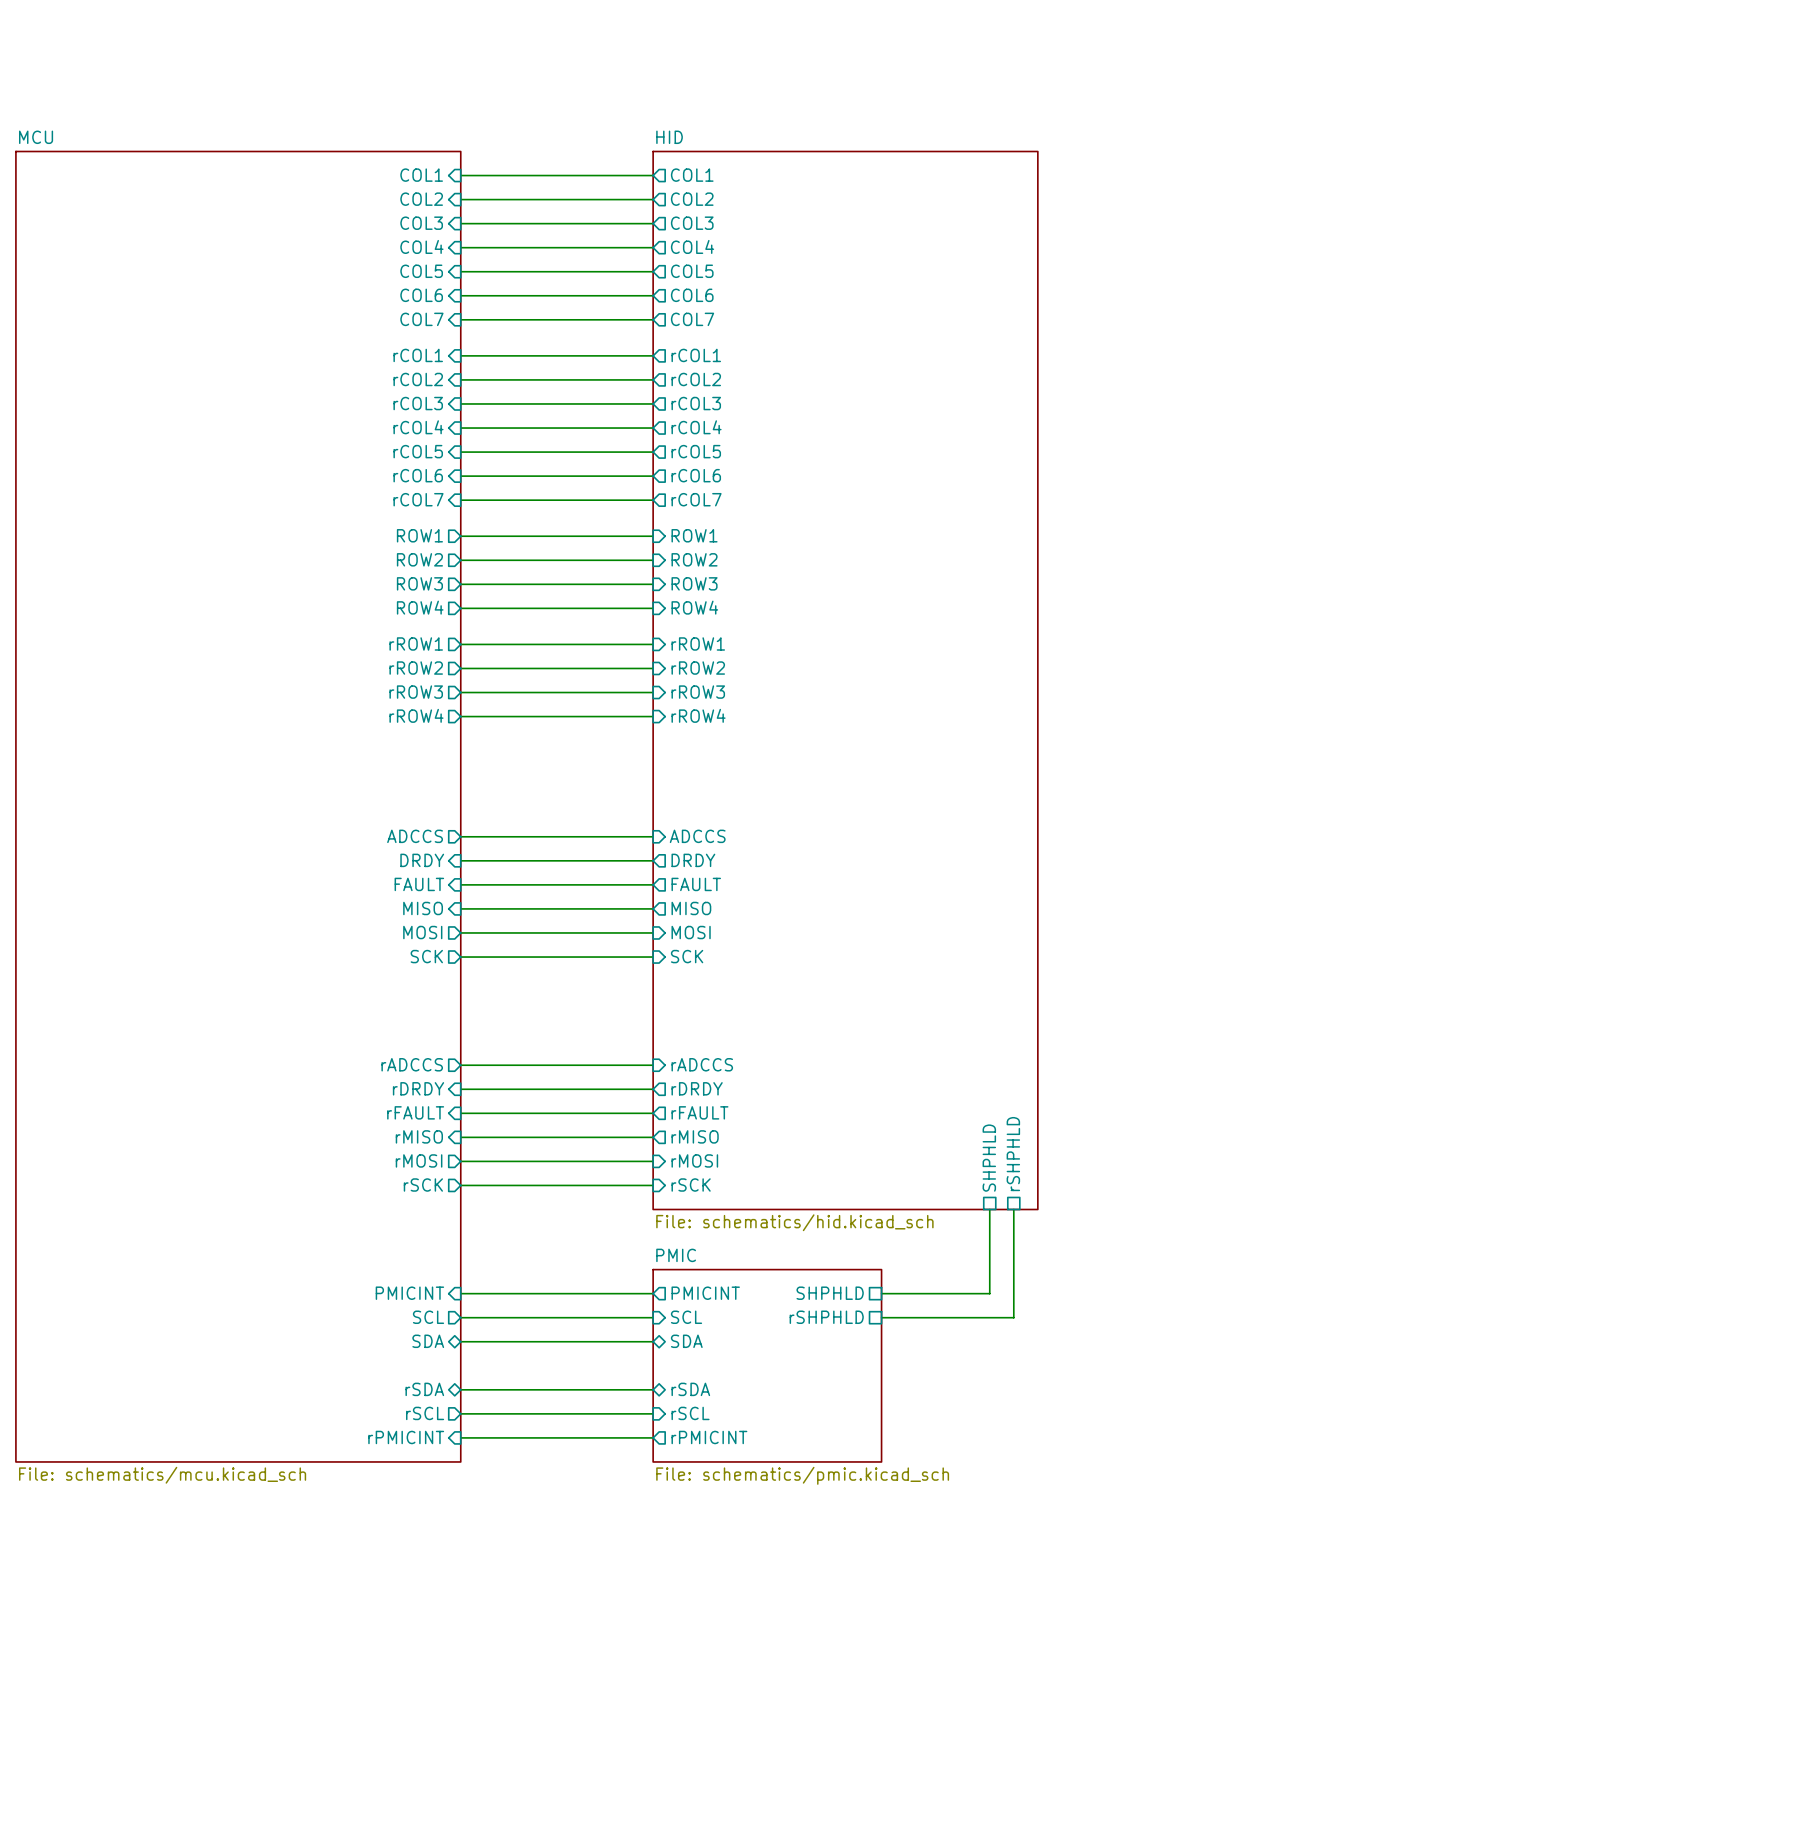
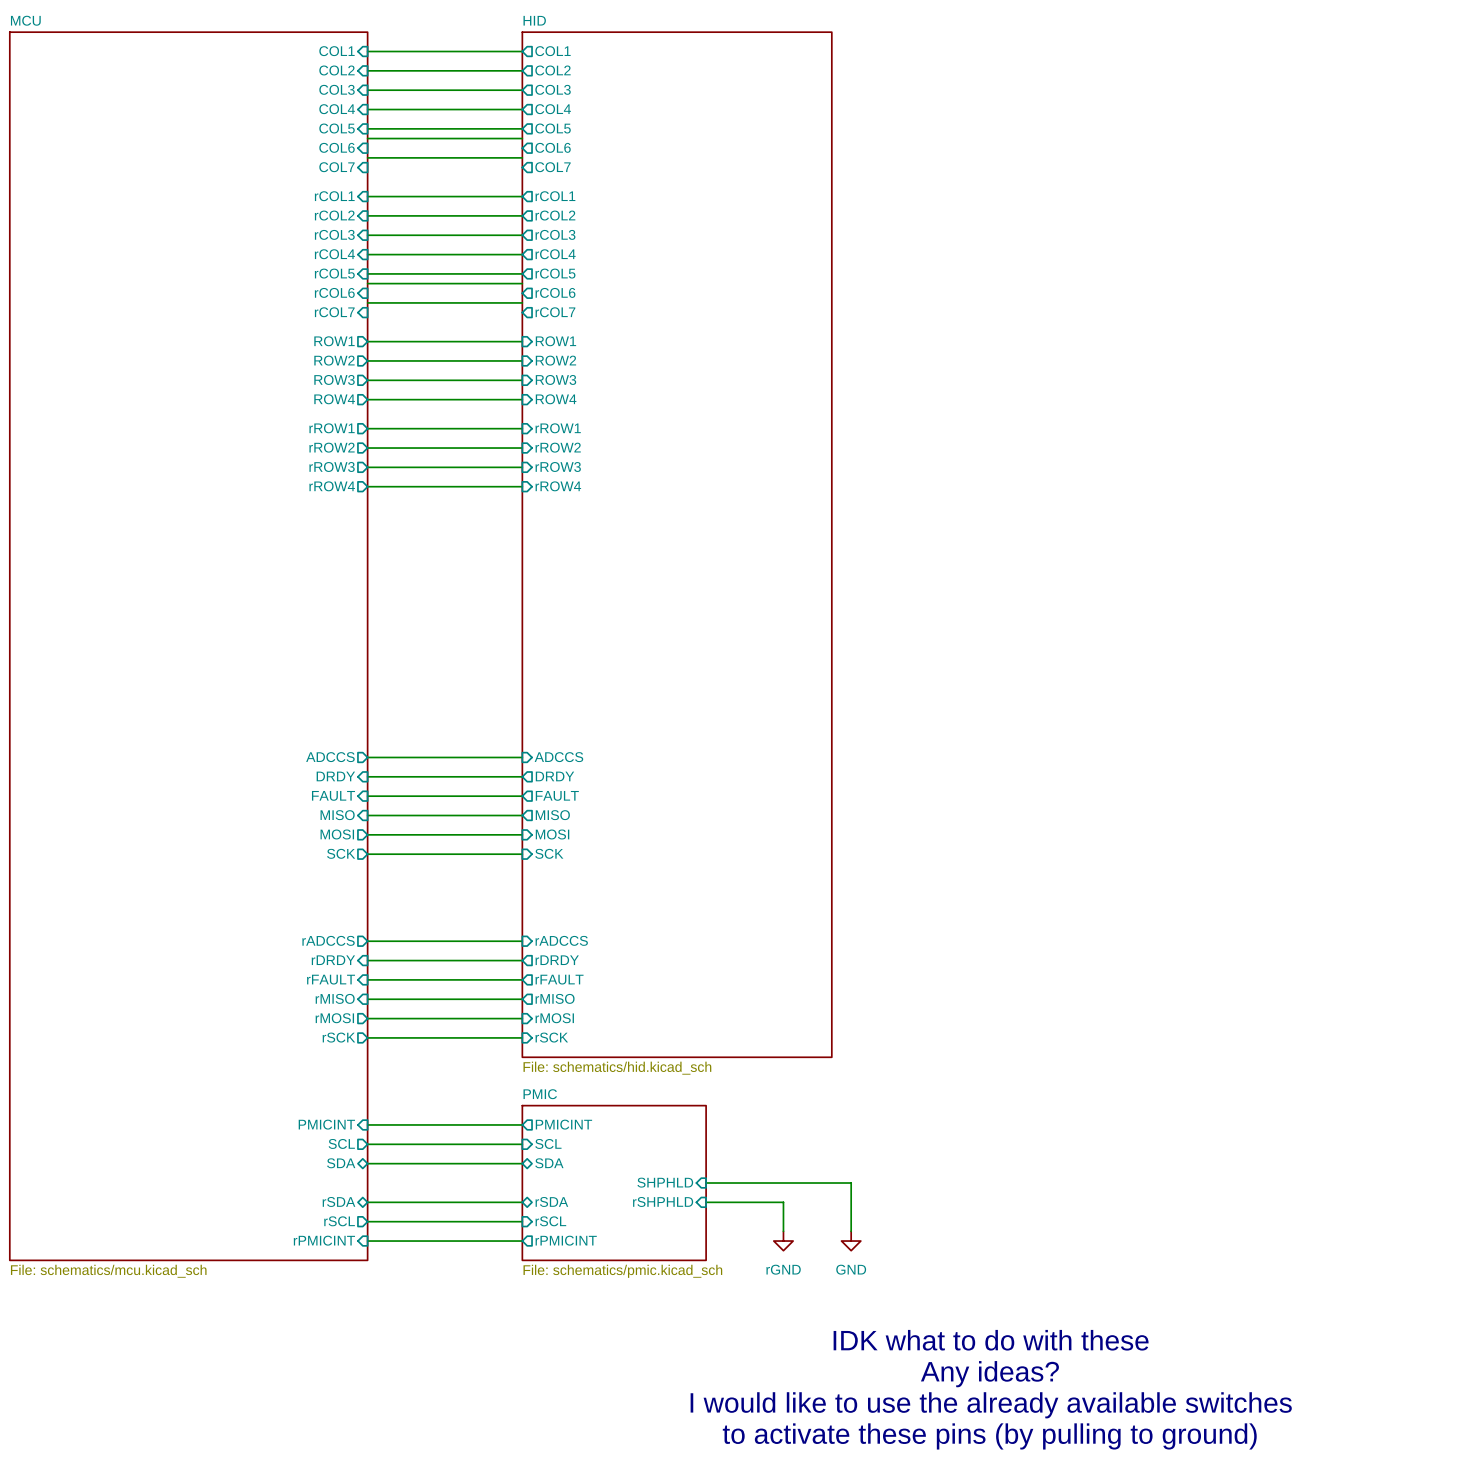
wire: none -> (367, 51) (522, 51)
wire: none -> (367, 70) (522, 70)
wire: none -> (367, 90) (522, 90)
sheet MCU name position: MCU (36, 137) -> MCU (25, 20)
sheet HID name position: HID (669, 137) -> HID (534, 20)
sheet pin: none -> COL4 (337, 109)
sheet pin: none -> COL4 (553, 109)
wire: none -> (367, 109) (522, 109)
sheet MCU shape: [15, 150, 462, 1463] -> [9, 31, 369, 1261]
sheet HID shape: [652, 150, 1039, 1211] -> [521, 31, 833, 1058]
sheet pin: none -> COL5 (337, 128)
sheet pin: none -> COL5 (553, 128)
sheet pin position: COL1 (421, 175) -> COL1 (336, 51)
sheet pin position: COL1 (692, 175) -> COL1 (553, 51)
sheet pin: none -> COL6 (337, 147)
sheet pin: none -> COL6 (553, 147)
sheet pin position: COL2 (421, 199) -> COL2 (336, 70)
sheet pin position: COL2 (692, 199) -> COL2 (553, 70)
sheet pin: none -> COL7 (336, 167)
sheet pin: none -> COL7 (553, 167)
sheet pin position: COL3 (421, 223) -> COL3 (337, 89)
wire: (460, 223) (653, 223) -> (367, 128) (522, 128)
sheet pin position: COL3 (692, 223) -> COL3 (553, 89)
sheet pin: COL4 (421, 246) -> rCOL1 (334, 196)
sheet pin: COL4 (692, 246) -> rCOL1 (555, 196)
sheet pin: COL5 (421, 271) -> rCOL2 (334, 215)
sheet pin: COL5 (692, 271) -> rCOL2 (555, 215)
sheet pin: COL6 (421, 295) -> rCOL3 (334, 234)
sheet pin: COL6 (692, 295) -> rCOL3 (555, 234)
sheet pin: COL7 (421, 319) -> rCOL4 (334, 254)
sheet pin: COL7 (692, 319) -> rCOL4 (555, 254)
sheet pin: none -> rCOL5 (334, 273)
sheet pin: none -> rCOL5 (555, 273)
sheet pin: rCOL1 (418, 355) -> none
sheet pin: rCOL1 (696, 355) -> none
sheet pin: none -> rCOL6 (334, 292)
sheet pin: none -> rCOL6 (555, 292)
sheet pin: rCOL2 (418, 379) -> none
sheet pin: rCOL2 (696, 379) -> none
sheet pin: none -> rCOL7 (334, 312)
sheet pin: none -> rCOL7 (555, 312)
sheet pin: rCOL3 (418, 403) -> none
wire: (460, 403) (653, 403) -> (367, 273) (522, 273)
sheet pin: rCOL3 (696, 403) -> none
sheet pin shape: input (418, 427) -> output (334, 341)
sheet pin: rCOL4 (418, 427) -> ROW1 (334, 341)
sheet pin shape: output (696, 427) -> input (555, 341)
sheet pin: rCOL4 (696, 427) -> ROW1 (555, 341)
sheet pin shape: input (418, 451) -> output (334, 360)
sheet pin: rCOL5 (418, 451) -> ROW2 (334, 360)
sheet pin shape: output (696, 451) -> input (555, 360)
sheet pin: rCOL5 (696, 451) -> ROW2 (555, 360)
sheet pin shape: input (418, 475) -> output (334, 379)
sheet pin: rCOL6 (418, 475) -> ROW3 (334, 379)
sheet pin shape: output (696, 475) -> input (555, 379)
sheet pin: rCOL6 (696, 475) -> ROW3 (555, 379)
sheet pin shape: input (418, 499) -> output (334, 399)
sheet pin: rCOL7 (418, 499) -> ROW4 (334, 399)
sheet pin shape: output (696, 499) -> input (556, 399)
sheet pin: rCOL7 (696, 499) -> ROW4 (556, 399)
sheet pin: ROW1 (419, 535) -> rROW1 (332, 428)
sheet pin: ROW1 (694, 535) -> rROW1 (558, 428)
sheet pin: ROW2 (419, 559) -> rROW2 (332, 447)
sheet pin: ROW2 (694, 559) -> rROW2 (558, 447)
sheet pin: ROW3 (419, 583) -> rROW3 (332, 466)
sheet pin: ROW3 (694, 583) -> rROW3 (558, 466)
sheet pin: ROW4 (420, 607) -> rROW4 (332, 486)
sheet pin: ROW4 (694, 607) -> rROW4 (558, 486)
sheet pin: rROW1 (416, 643) -> none
sheet pin: rROW1 (698, 643) -> none
wire: (460, 644) (653, 644) -> none
sheet pin: rROW2 (416, 668) -> none
wire: (460, 668) (653, 668) -> none
sheet pin: rROW2 (698, 668) -> none
sheet pin: rROW3 (416, 692) -> none
wire: (460, 692) (653, 692) -> none
sheet pin: rROW3 (698, 692) -> none
sheet pin: rROW4 (416, 715) -> none
sheet pin: rROW4 (698, 715) -> none
wire: (460, 716) (653, 716) -> none
sheet pin position: ADCCS (415, 836) -> ADCCS (330, 757)
wire: (460, 836) (653, 836) -> none
sheet pin position: ADCCS (697, 836) -> ADCCS (558, 757)
sheet pin position: DRDY (422, 860) -> DRDY (335, 776)
wire: (460, 860) (653, 860) -> (367, 757) (522, 757)
sheet pin position: DRDY (693, 860) -> DRDY (554, 776)
sheet pin position: FAULT (419, 884) -> FAULT (333, 795)
wire: (460, 884) (653, 884) -> (367, 776) (522, 776)
sheet pin position: FAULT (696, 884) -> FAULT (557, 795)
sheet pin position: MISO (423, 908) -> MISO (337, 815)
wire: (460, 908) (653, 908) -> (367, 796) (522, 796)
sheet pin position: MISO (691, 908) -> MISO (552, 815)
sheet pin position: MOSI (422, 932) -> MOSI (337, 834)
wire: (460, 932) (653, 932) -> (367, 815) (522, 815)
sheet pin position: MOSI (691, 932) -> MOSI (552, 834)
sheet pin: SCK (426, 956) -> none
sheet pin: SCK (687, 956) -> none
wire: (460, 957) (653, 957) -> (367, 834) (522, 834)
sheet pin: rADCCS (412, 1064) -> SCK (341, 853)
sheet pin: rADCCS (702, 1064) -> SCK (549, 853)
sheet pin position: rDRDY (418, 1088) -> rDRDY (333, 960)
sheet pin position: rDRDY (697, 1088) -> rDRDY (557, 960)
wire: (460, 1089) (653, 1089) -> (367, 941) (522, 941)
sheet pin position: rFAULT (415, 1112) -> rFAULT (331, 979)
sheet pin position: rFAULT (699, 1112) -> rFAULT (559, 979)
wire: (460, 1113) (653, 1113) -> (367, 960) (522, 960)
sheet pin position: rMISO (419, 1136) -> rMISO (335, 998)
sheet pin position: rMISO (695, 1136) -> rMISO (555, 998)
wire: (460, 1137) (653, 1137) -> (367, 979) (522, 979)
sheet pin: rSHPHLD (1013, 1154) -> none
sheet pin: SHPHLD (989, 1158) -> none
sheet pin position: rMOSI (419, 1160) -> rMOSI (334, 1018)
sheet pin position: rMOSI (694, 1160) -> rMOSI (554, 1018)
wire: (460, 1161) (653, 1161) -> (367, 999) (522, 999)
sheet pin: none -> rADCCS (328, 940)
sheet pin: none -> rADCCS (561, 940)
sheet pin: rSCK (423, 1185) -> none
wire: (460, 1185) (653, 1185) -> (367, 1018) (522, 1018)
sheet pin: rSCK (691, 1185) -> none
wire: (989, 1209) (989, 1293) (881, 1293) -> none
wire: (1013, 1209) (1013, 1317) (881, 1317) -> none
sheet HID value position: File: schematics/hid.kicad_sch (794, 1222) -> File: schematics/hid.kicad_sch (617, 1068)
sheet pin shape: input (409, 1293) -> output (338, 1037)
sheet pin: PMICINT (409, 1293) -> rSCK (338, 1037)
sheet pin shape: output (705, 1293) -> input (551, 1037)
sheet pin: PMICINT (705, 1293) -> rSCK (551, 1037)
sheet pin: SHPHLD (830, 1293) -> none
sheet pin position: SCL (428, 1317) -> SCL (341, 1143)
wire: (460, 1317) (653, 1317) -> (367, 1124) (522, 1124)
sheet pin position: SCL (686, 1317) -> SCL (548, 1143)
sheet pin: rSHPHLD (826, 1317) -> none
sheet pin position: SDA (428, 1341) -> SDA (341, 1163)
wire: (460, 1341) (653, 1341) -> (367, 1144) (522, 1144)
sheet pin position: SDA (686, 1341) -> SDA (549, 1163)
sheet PMIC position: (767, 1365) -> (614, 1183)
sheet pin position: rSDA (424, 1389) -> rSDA (339, 1201)
wire: (460, 1389) (653, 1389) -> (367, 1163) (522, 1163)
sheet pin position: rSDA (690, 1389) -> rSDA (551, 1201)
sheet pin: none -> PMICINT (326, 1124)
sheet pin: none -> PMICINT (563, 1124)
sheet pin position: rSCL (425, 1413) -> rSCL (339, 1221)
wire: (460, 1413) (653, 1413) -> (367, 1202) (522, 1202)
sheet pin position: rSCL (690, 1413) -> rSCL (550, 1221)
sheet pin position: rPMICINT (406, 1437) -> rPMICINT (324, 1240)
wire: (460, 1437) (653, 1437) -> (367, 1221) (522, 1221)
sheet pin position: rPMICINT (709, 1437) -> rPMICINT (566, 1240)
sheet pin: none -> SHPHLD (665, 1182)
wire: none -> (706, 1183) (851, 1183) (851, 1231)
sheet MCU value position: File: schematics/mcu.kicad_sch (162, 1475) -> File: schematics/mcu.kicad_sch (108, 1271)
sheet pin: none -> rSHPHLD (663, 1201)
wire: none -> (706, 1202) (783, 1202) (783, 1231)
wire: none -> (367, 1241) (522, 1241)
power symbol: none -> rGND (783, 1241)
power symbol: none -> GND (851, 1241)
text: none -> IDK what to do with these (991, 1340)
text: none -> Any ideas? (989, 1374)
text: none -> I would like to use the already available switches (991, 1405)
text: none -> to activate these pins (by pulling to ground) (989, 1436)

